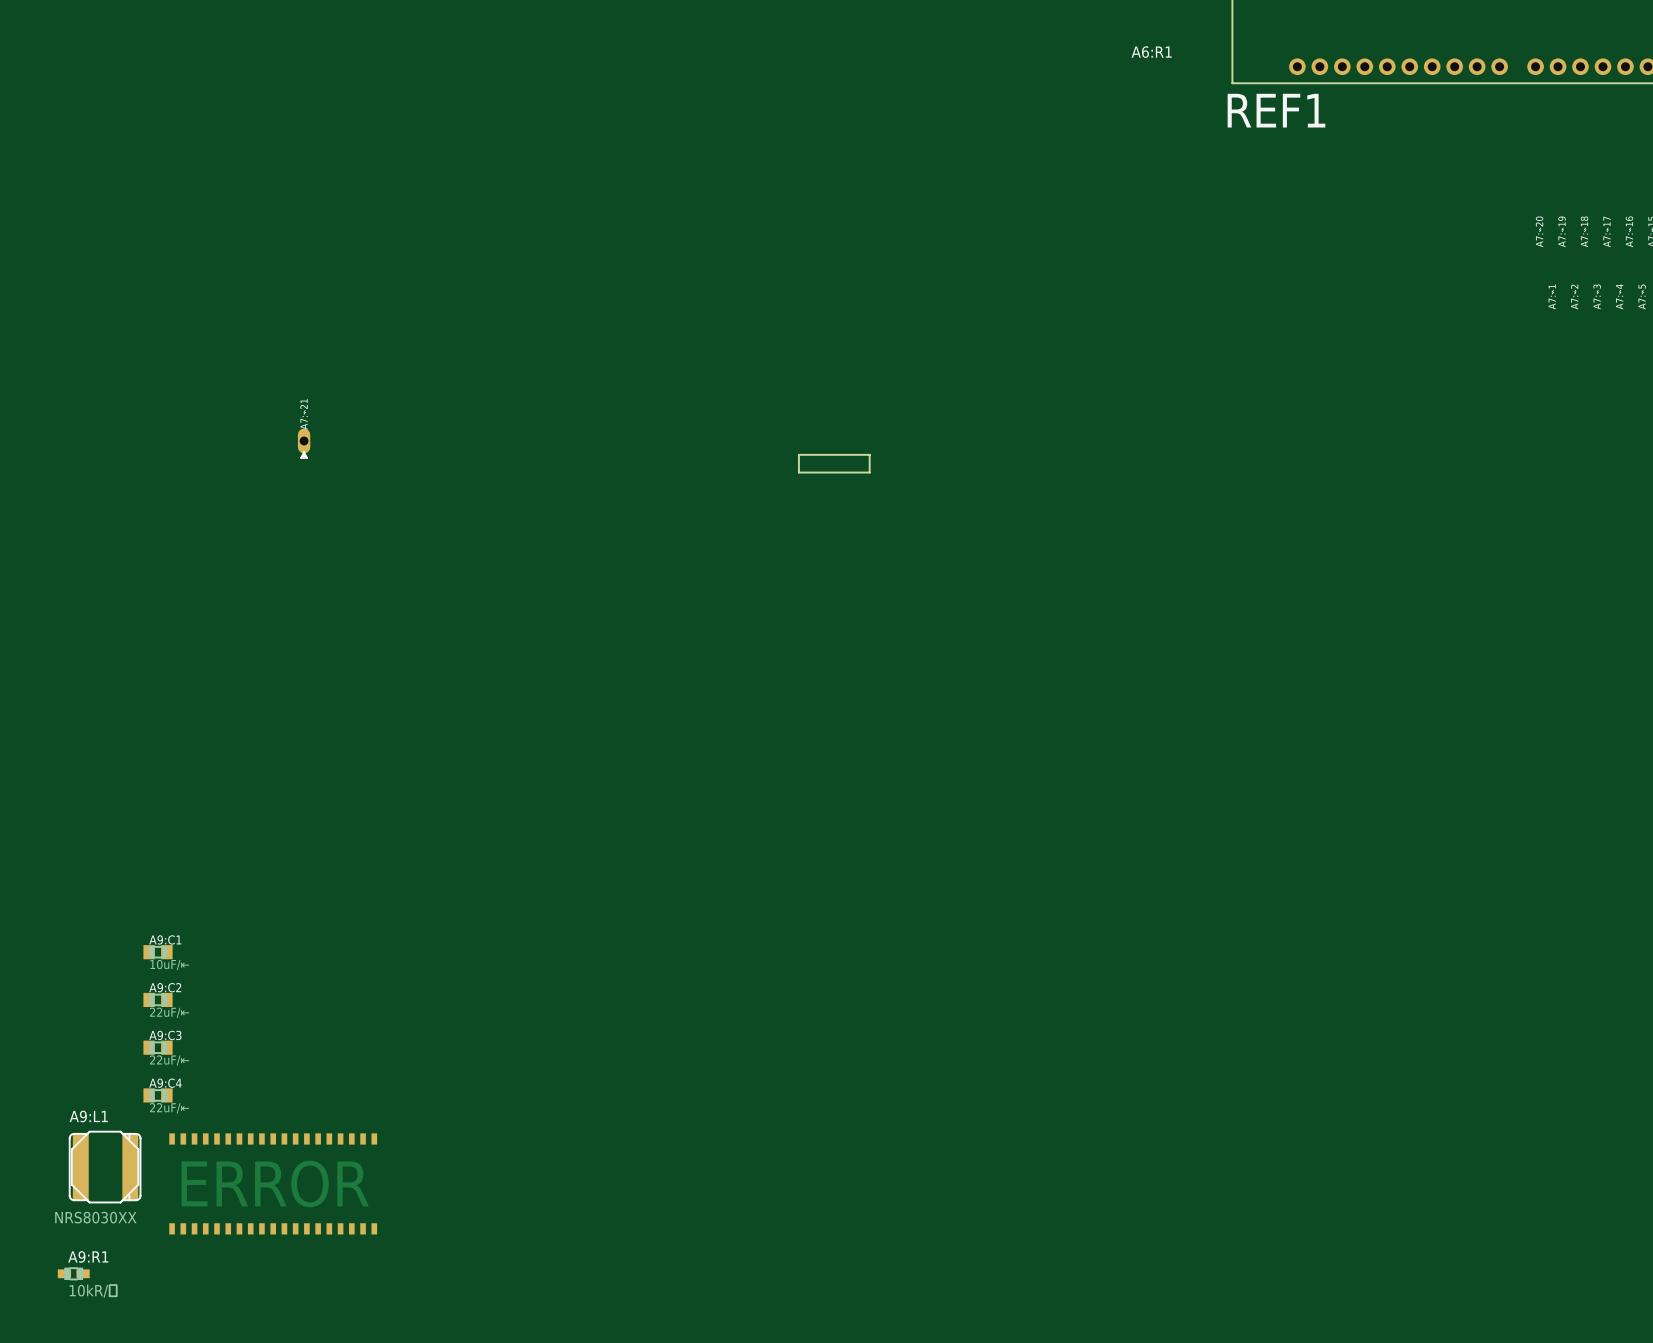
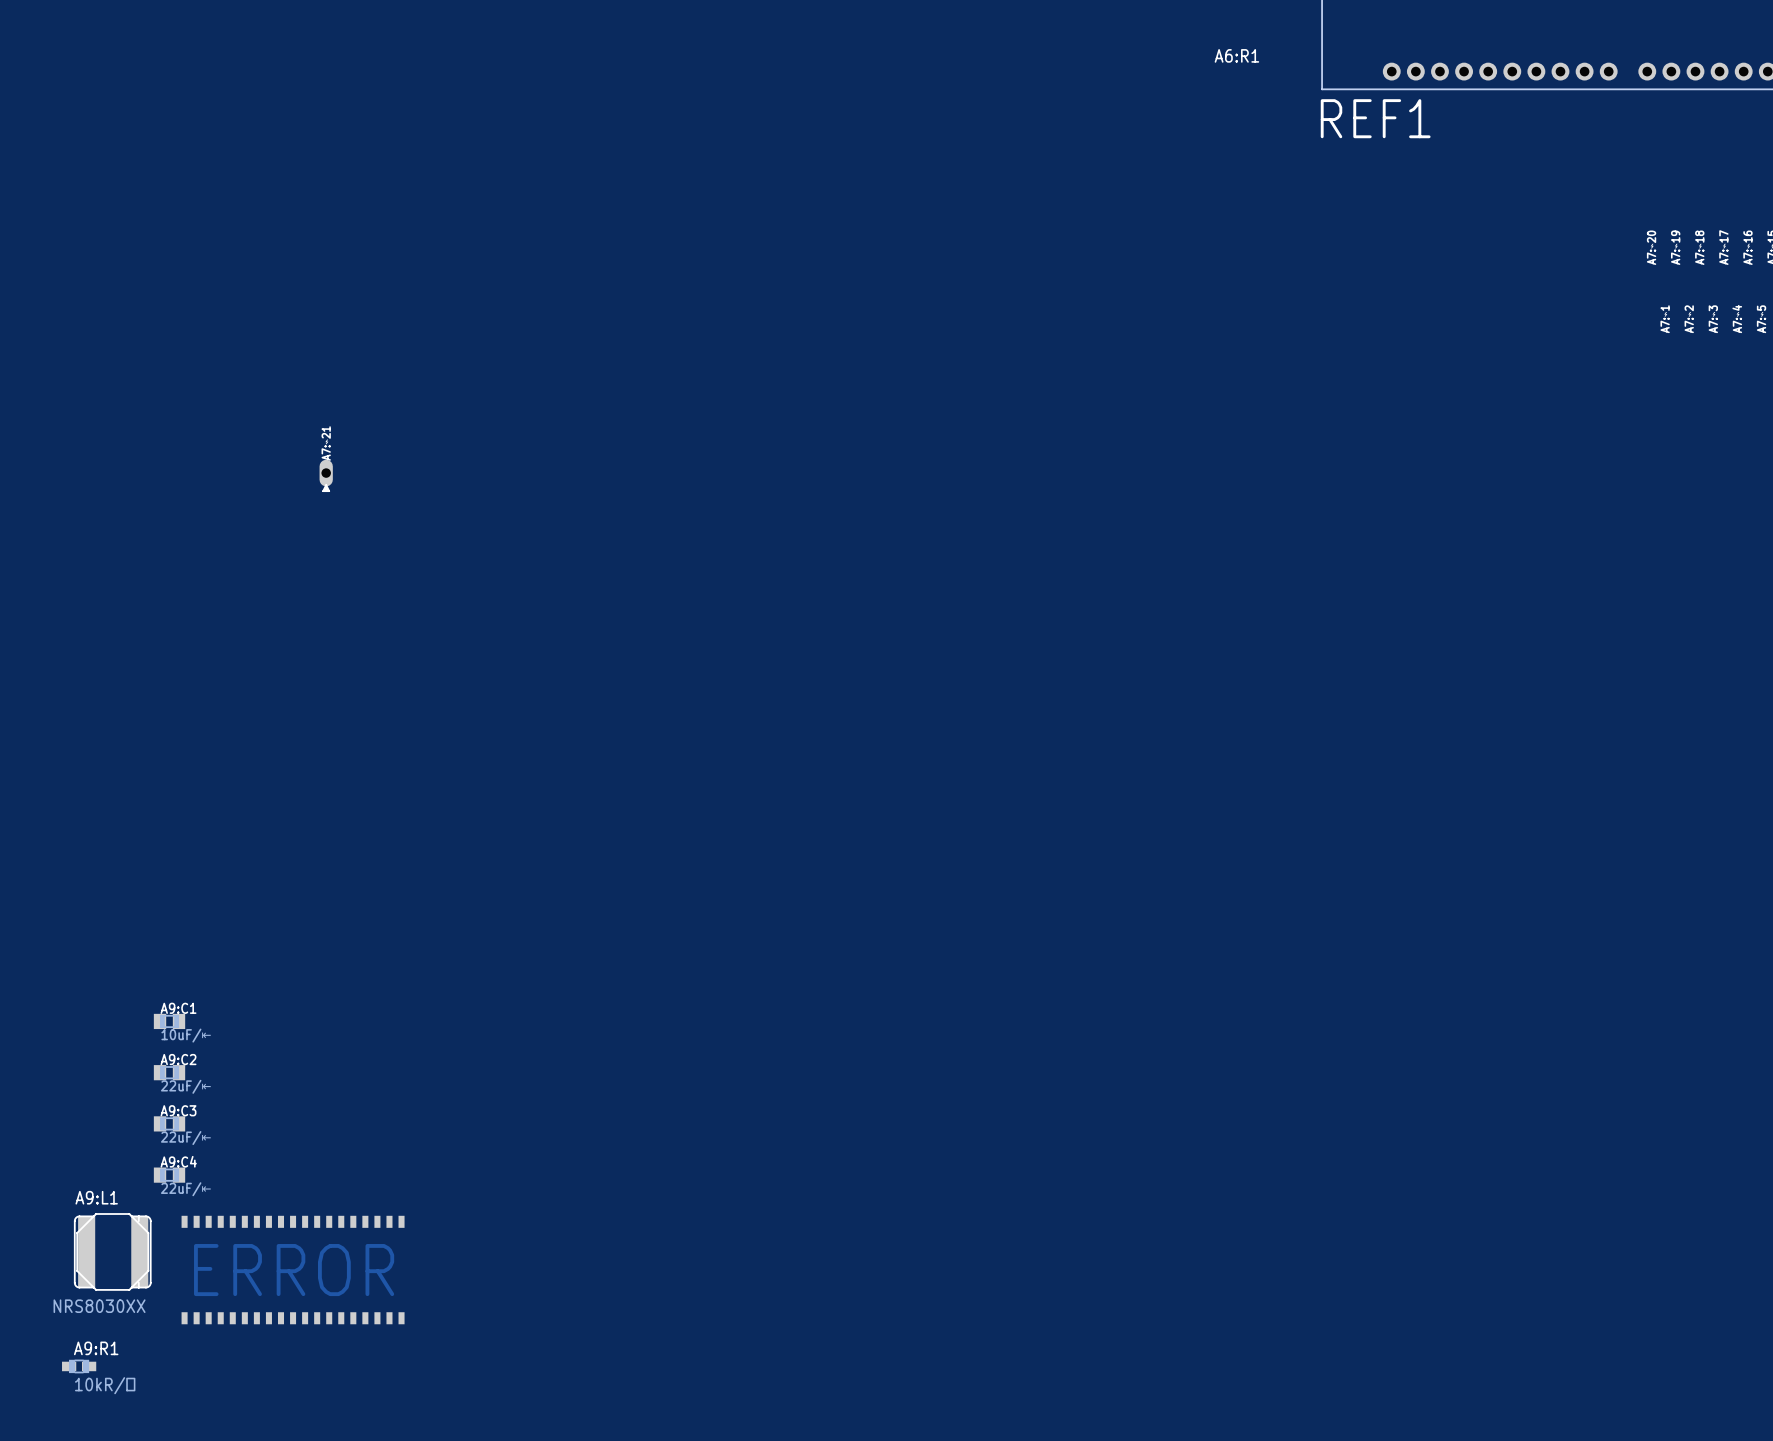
board edge: (798, 454) (869, 454) (869, 472) (798, 472) (798, 454) -> none

